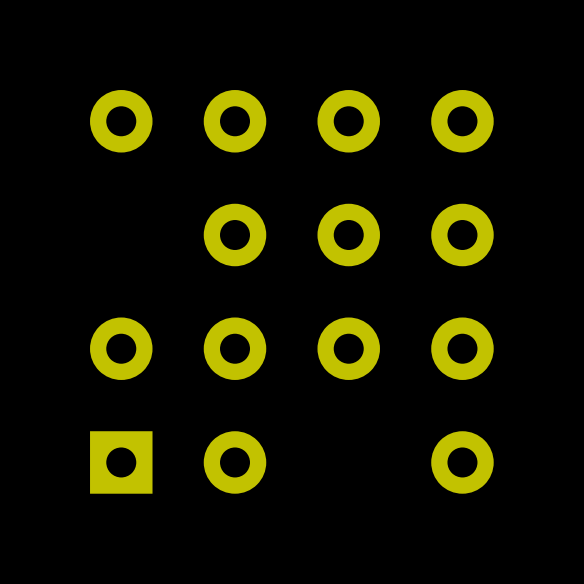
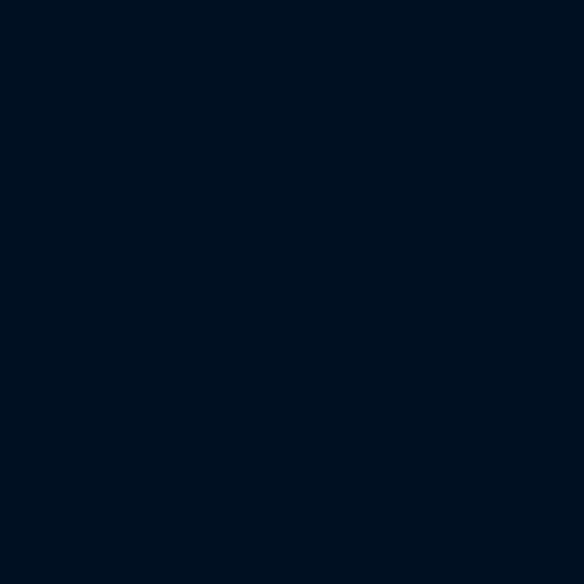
part: (121, 121) -> none
part: (235, 121) -> none
part: (348, 121) -> none
part: (462, 121) -> none
part: (235, 235) -> none
part: (348, 235) -> none
part: (462, 235) -> none
part: (121, 348) -> none
part: (235, 348) -> none
part: (348, 348) -> none
part: (462, 348) -> none
part: (121, 462) -> none
part: (235, 462) -> none
part: (462, 462) -> none

